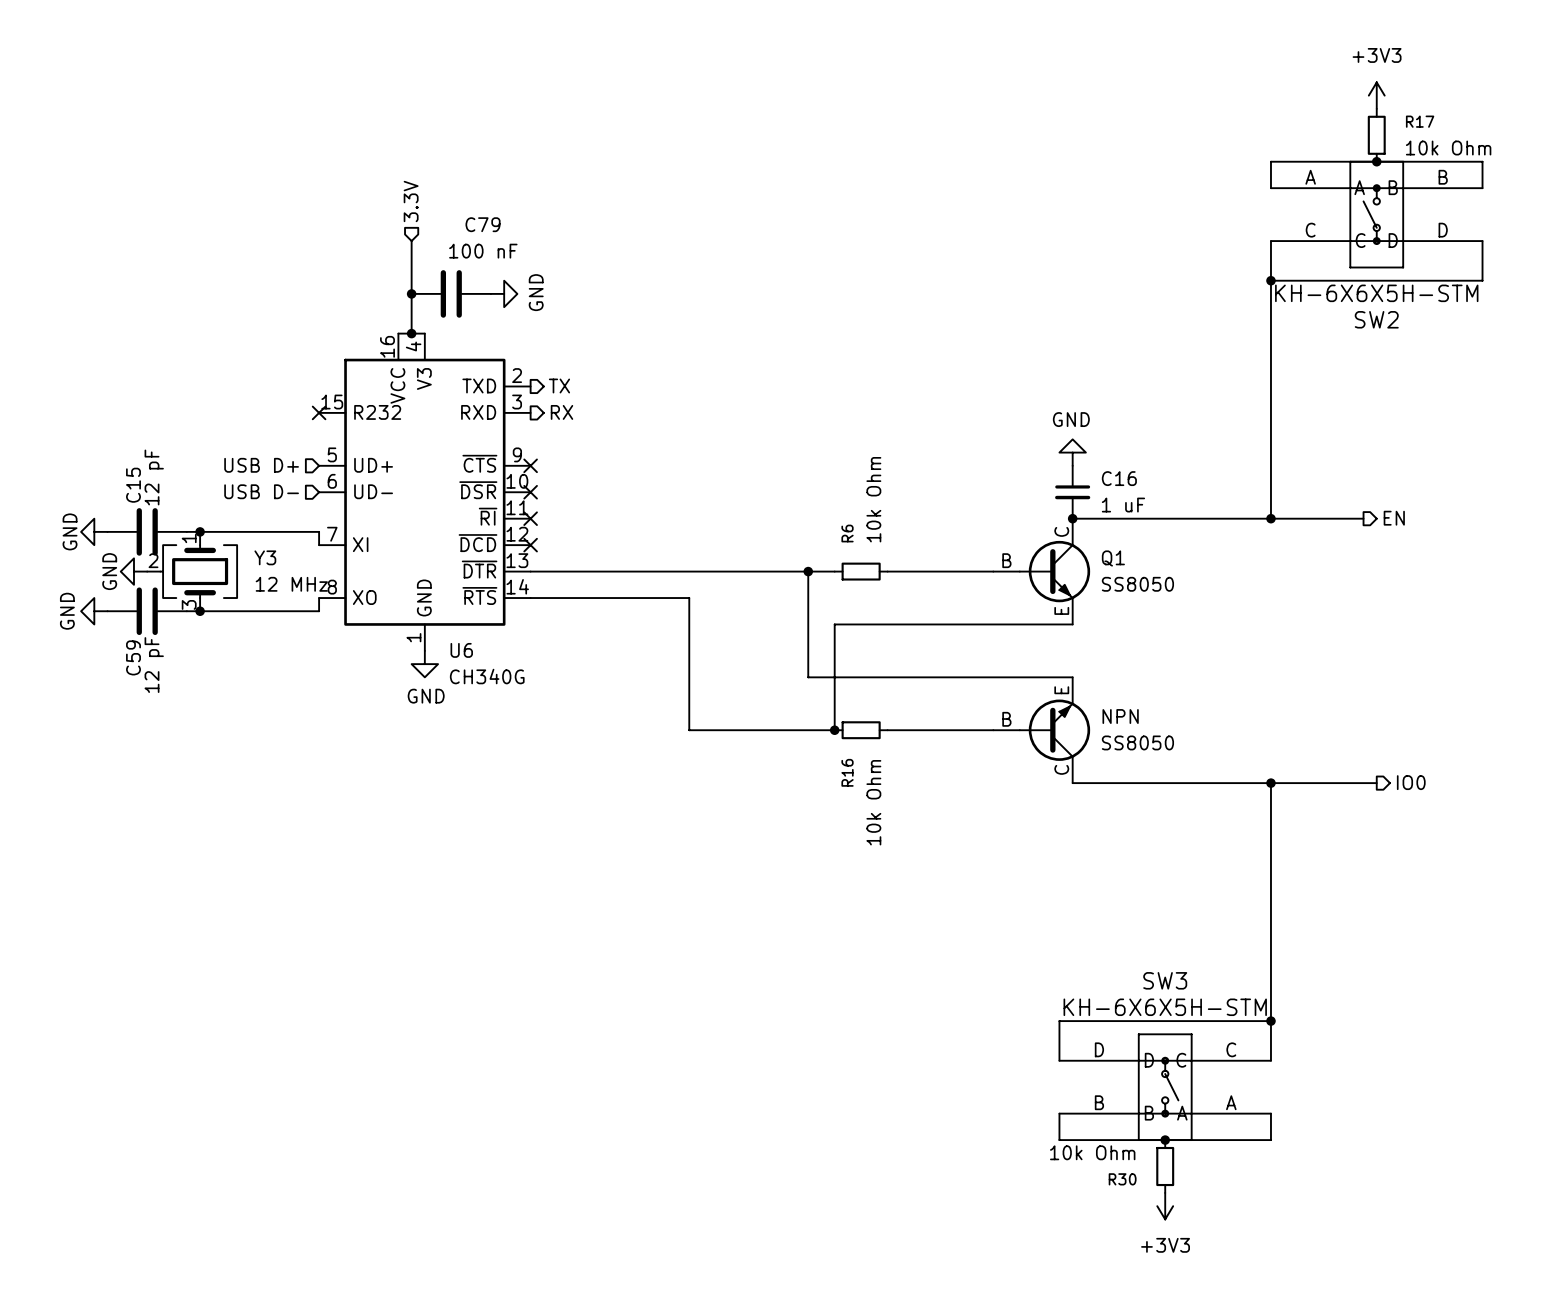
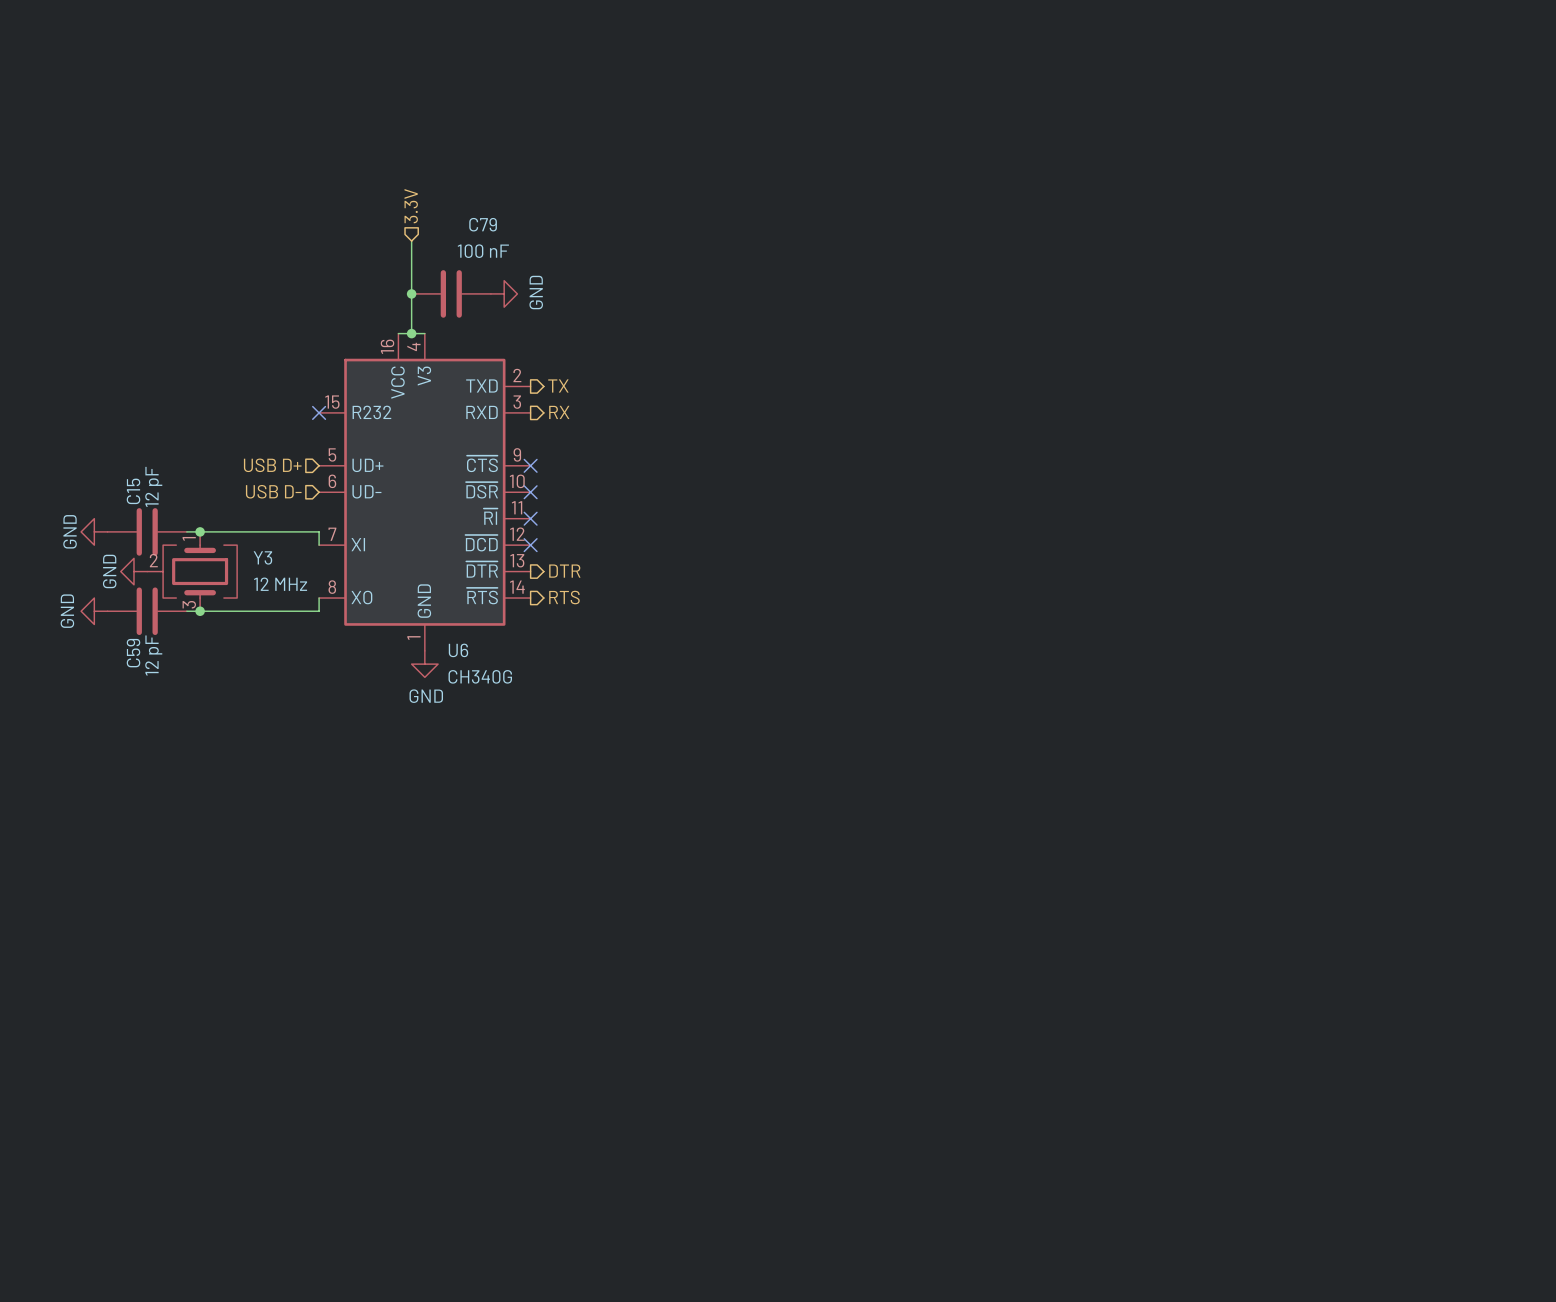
power symbol: +3V3 (1376, 95) -> none
R17: 10k Ohm (1376, 135) -> none
junction: (1376, 161) -> none
wire: (1270, 188) (1270, 161) (1482, 161) (1482, 188) -> none
SW2: KH-6X6X5H-STM (1376, 214) -> none
wire: (1270, 241) (1270, 518) -> none
wire: (1482, 241) (1482, 280) (1270, 280) -> none
junction: (1270, 280) -> none
power symbol: GND (1072, 452) -> none
C16: 1 uF (1072, 492) -> none
wire: (1072, 518) (1363, 518) -> none
junction: (1072, 518) -> none
junction: (1270, 518) -> none
hierarchical label: EN (1394, 518) -> none
wire: (530, 571) (834, 571) -> none
hierarchical label: none -> DTR (564, 571)
wire: (808, 571) (808, 677) (1072, 677) -> none
junction: (808, 571) -> none
R6: 10k Ohm (861, 571) -> none
wire: (887, 571) (993, 571) -> none
Q1: SS8050 (1041, 571) -> none
hierarchical label: none -> RTS (564, 597)
wire: (530, 598) (689, 598) (689, 730) (834, 730) (834, 624) (1072, 624) -> none
junction: (834, 730) -> none
R16: 10k Ohm (861, 730) -> none
wire: (887, 730) (993, 730) -> none
SS8050: NPN (1041, 730) -> none
hierarchical label: IO0 (1411, 782) -> none
wire: (1072, 783) (1376, 783) -> none
wire: (1270, 783) (1270, 1060) -> none
junction: (1270, 783) -> none
wire: (1270, 1021) (1059, 1021) (1059, 1060) -> none
junction: (1270, 1021) -> none
SW3: KH-6X6X5H-STM (1165, 1087) -> none
wire: (1059, 1113) (1059, 1140) (1270, 1140) (1270, 1113) -> none
junction: (1165, 1140) -> none
R30: 10k Ohm (1165, 1166) -> none
power symbol: +3V3 (1165, 1206) -> none

